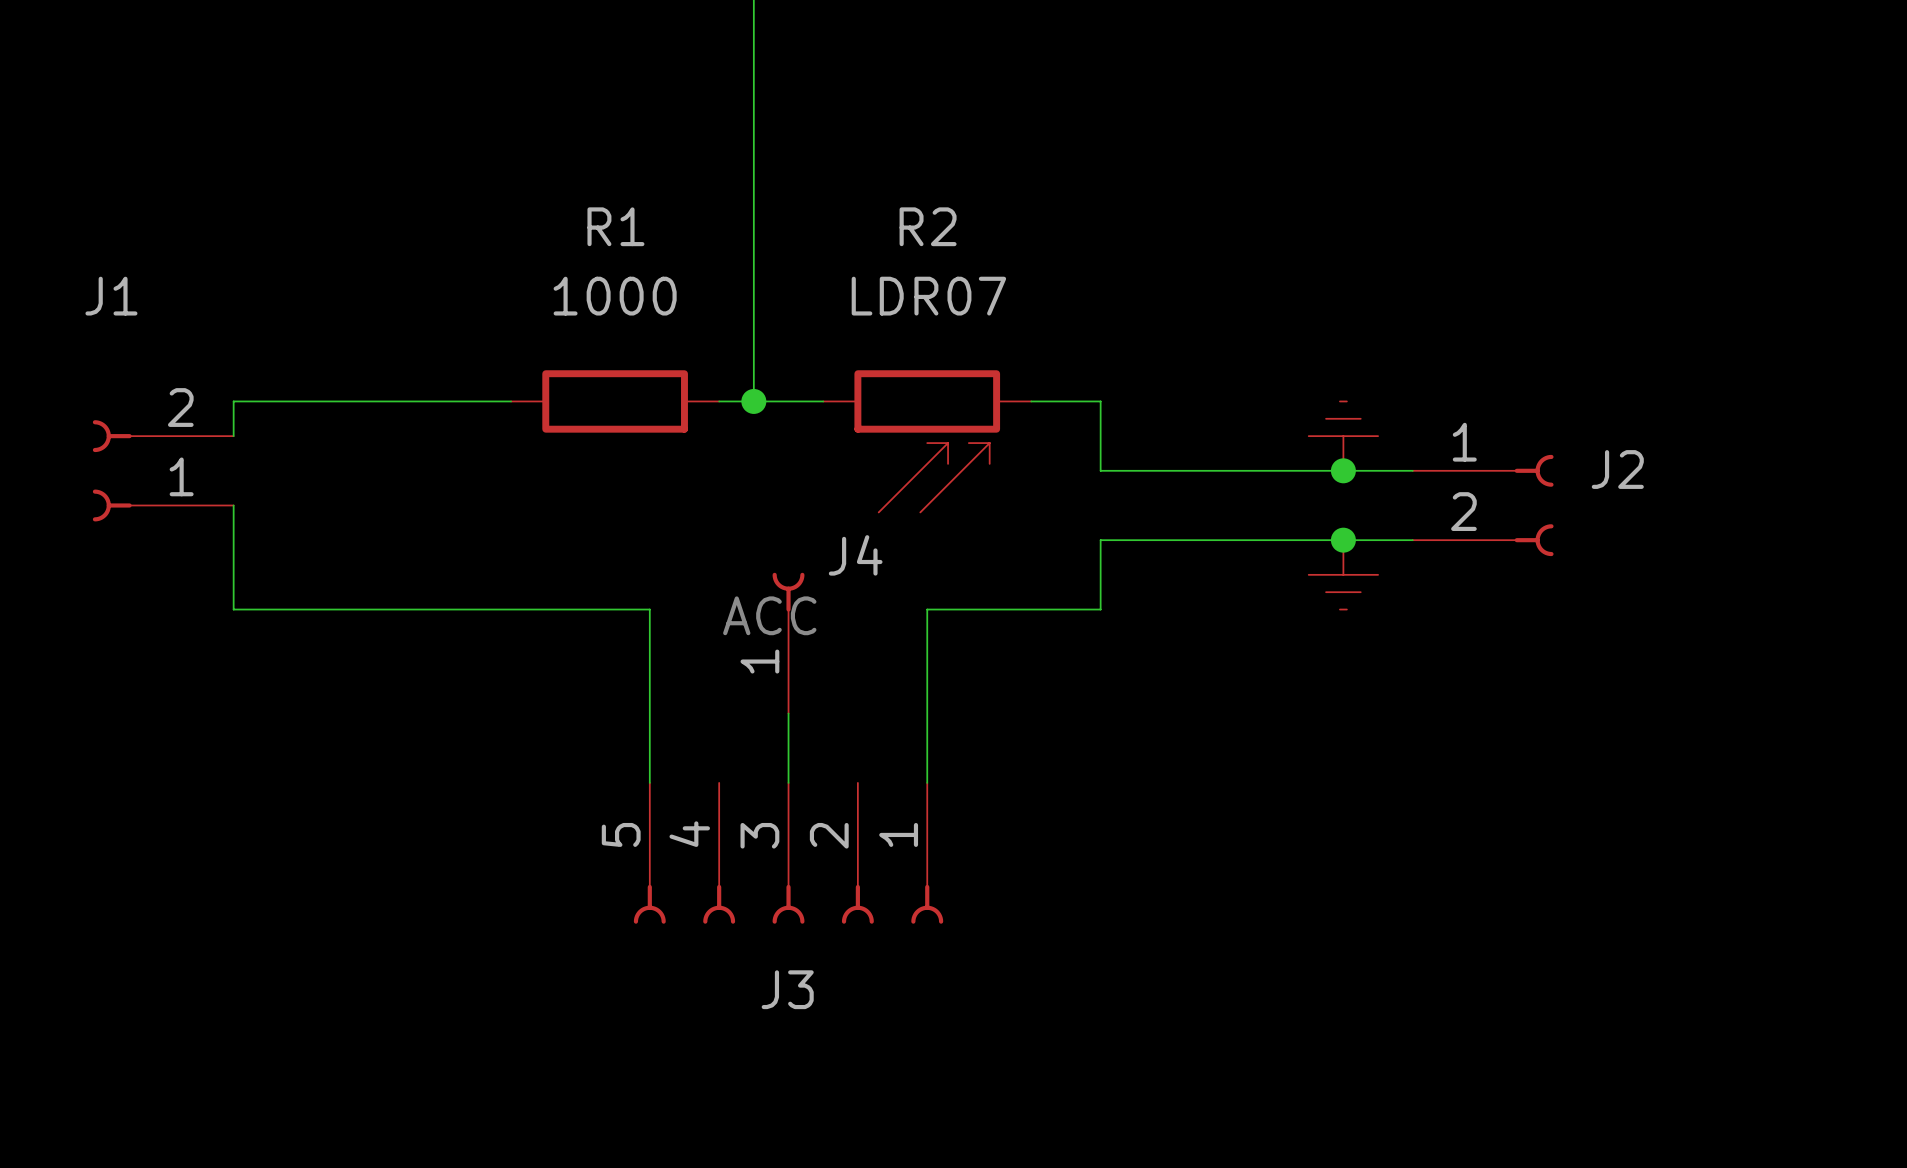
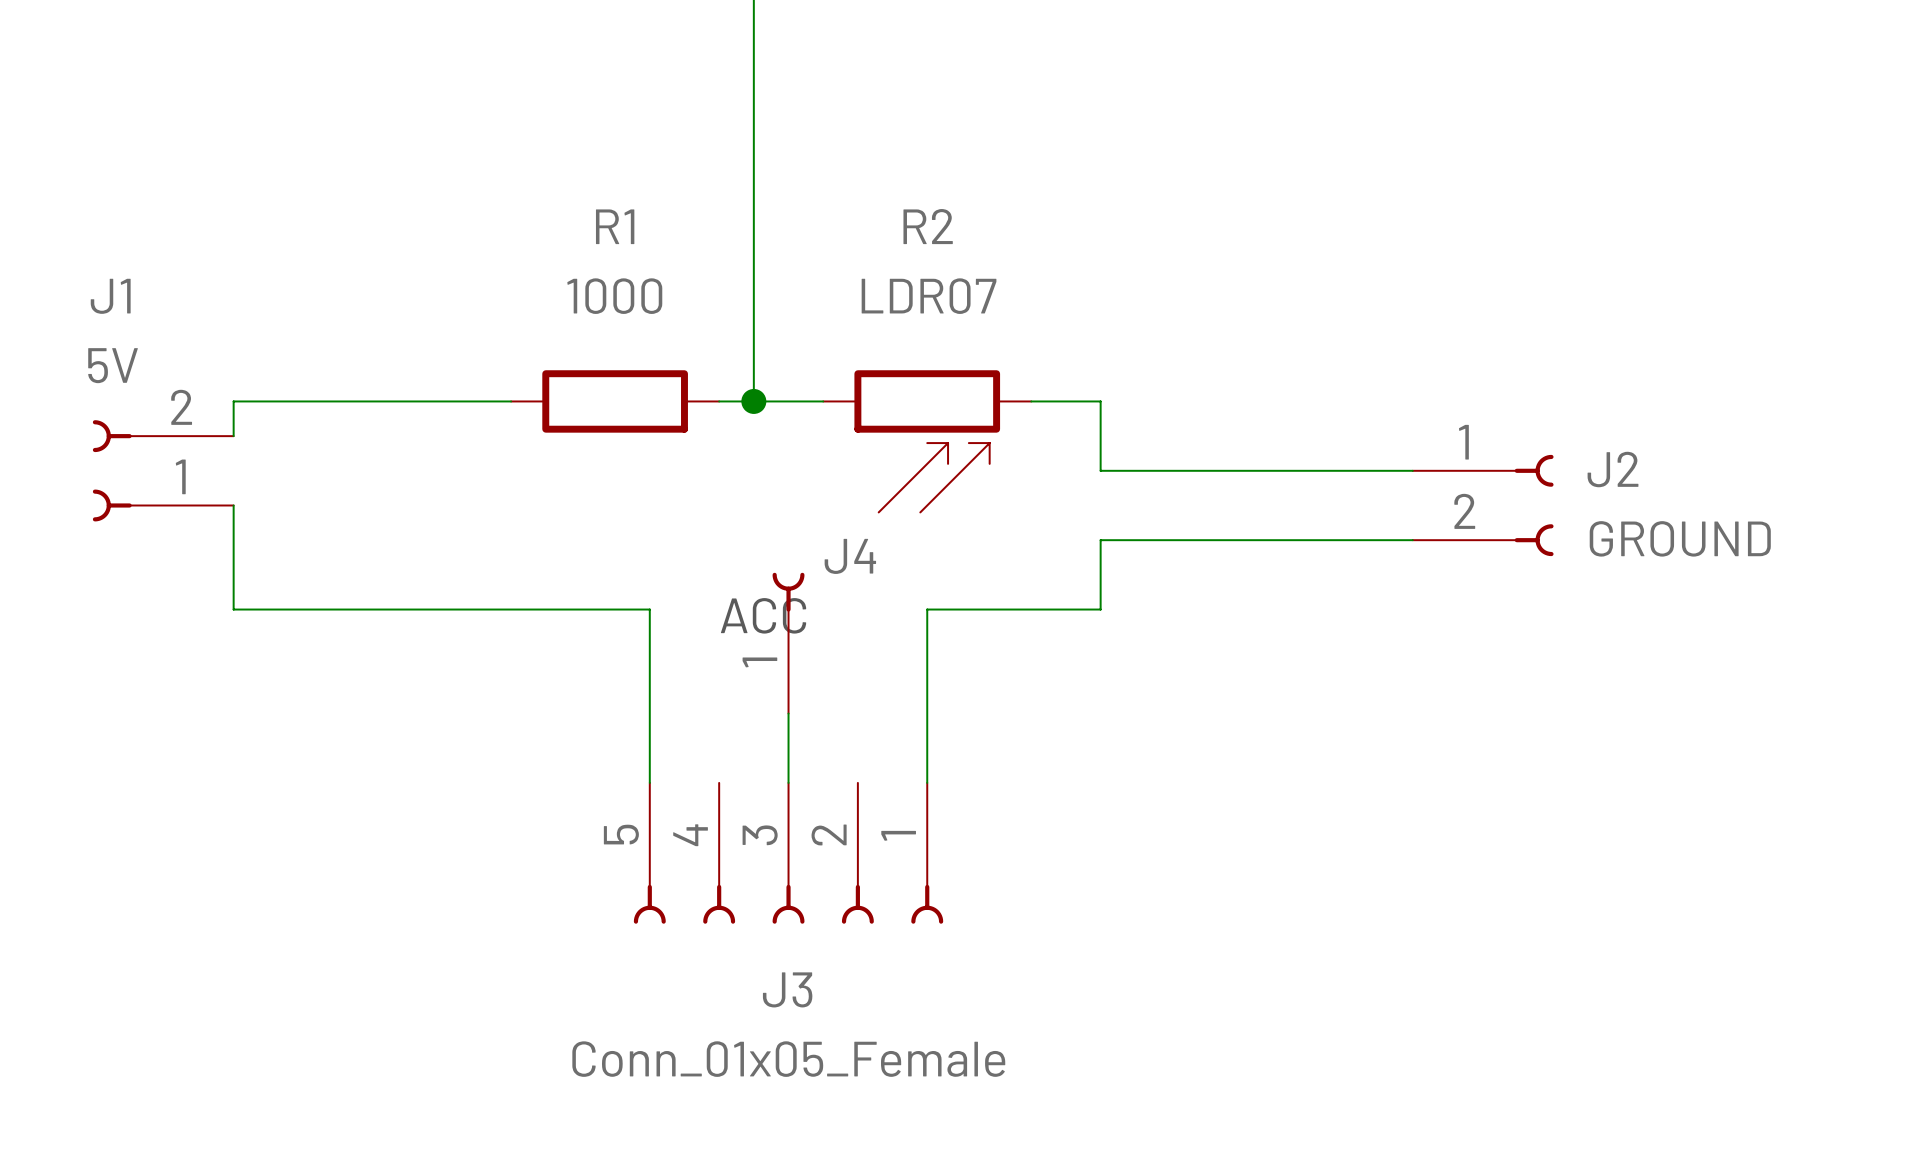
J1 value: none -> 5V (113, 365)
power symbol: (1343, 436) -> none
junction: (1343, 470) -> none
J2 value: none -> GROUND (1680, 538)
junction: (1343, 540) -> none
power symbol: (1343, 574) -> none
J3 value: none -> Conn_01x05_Female (788, 1059)

